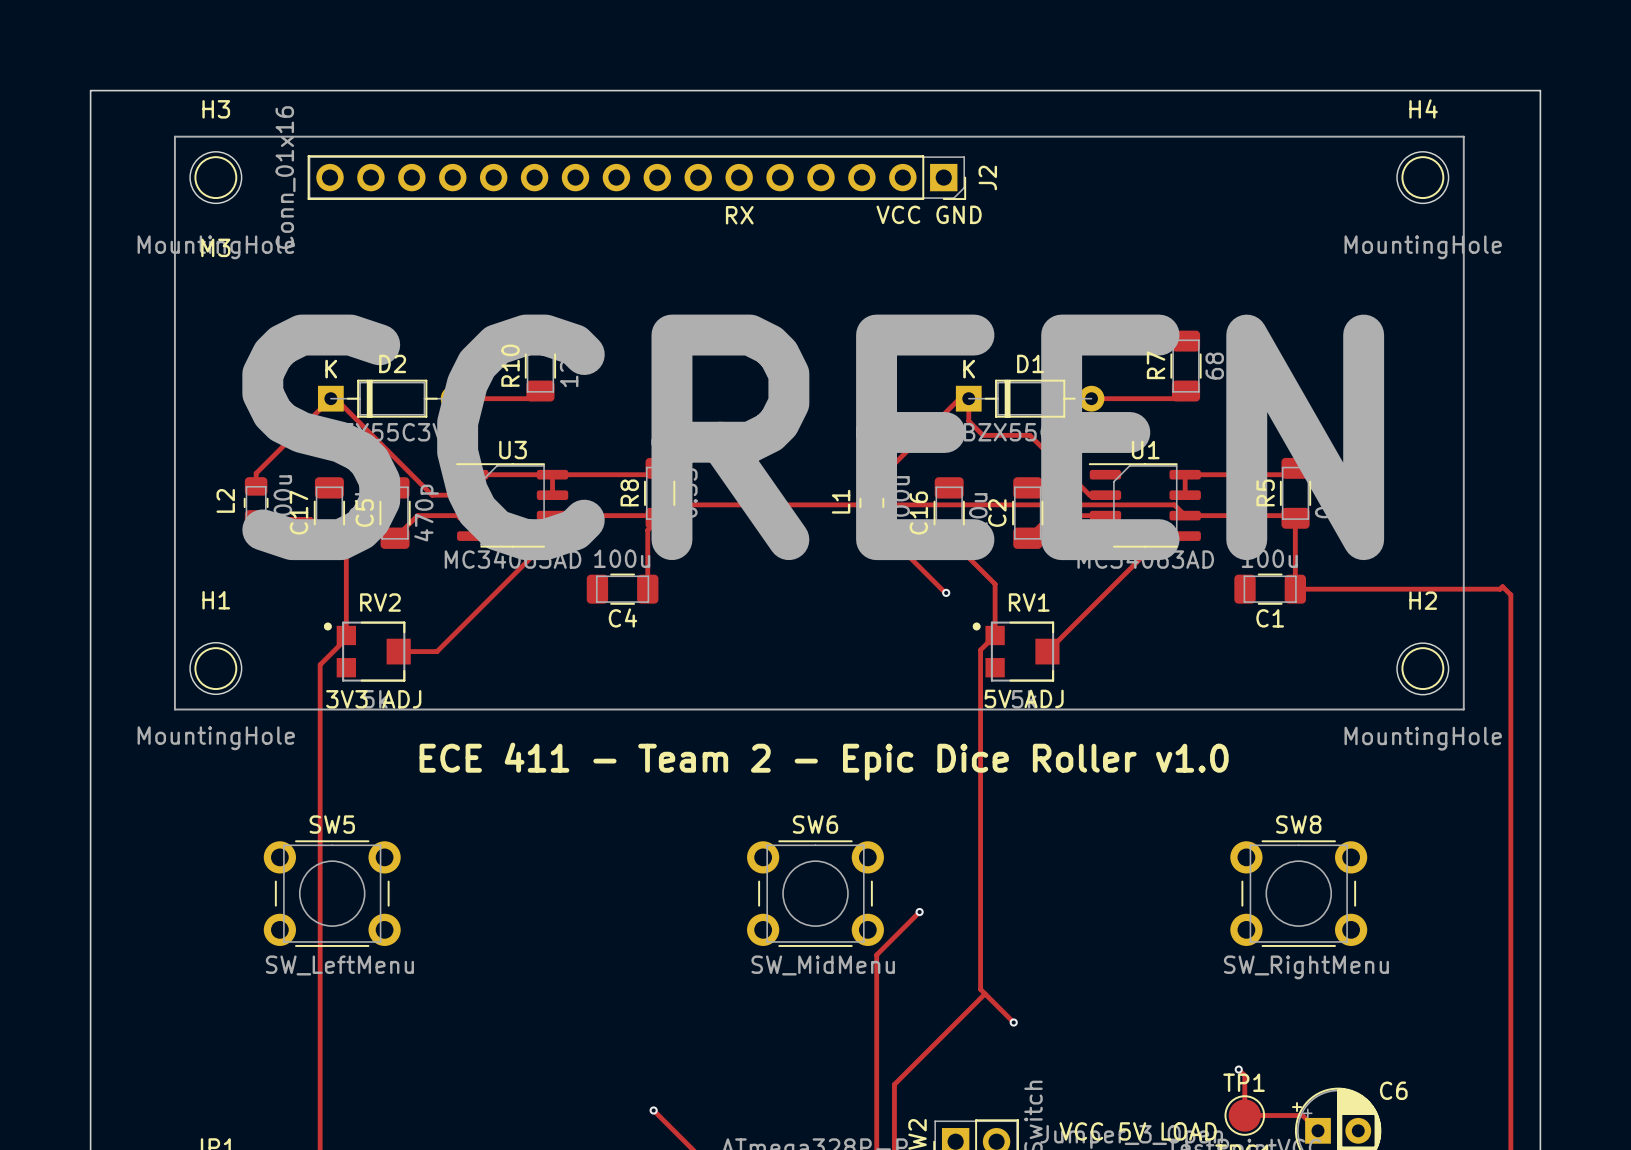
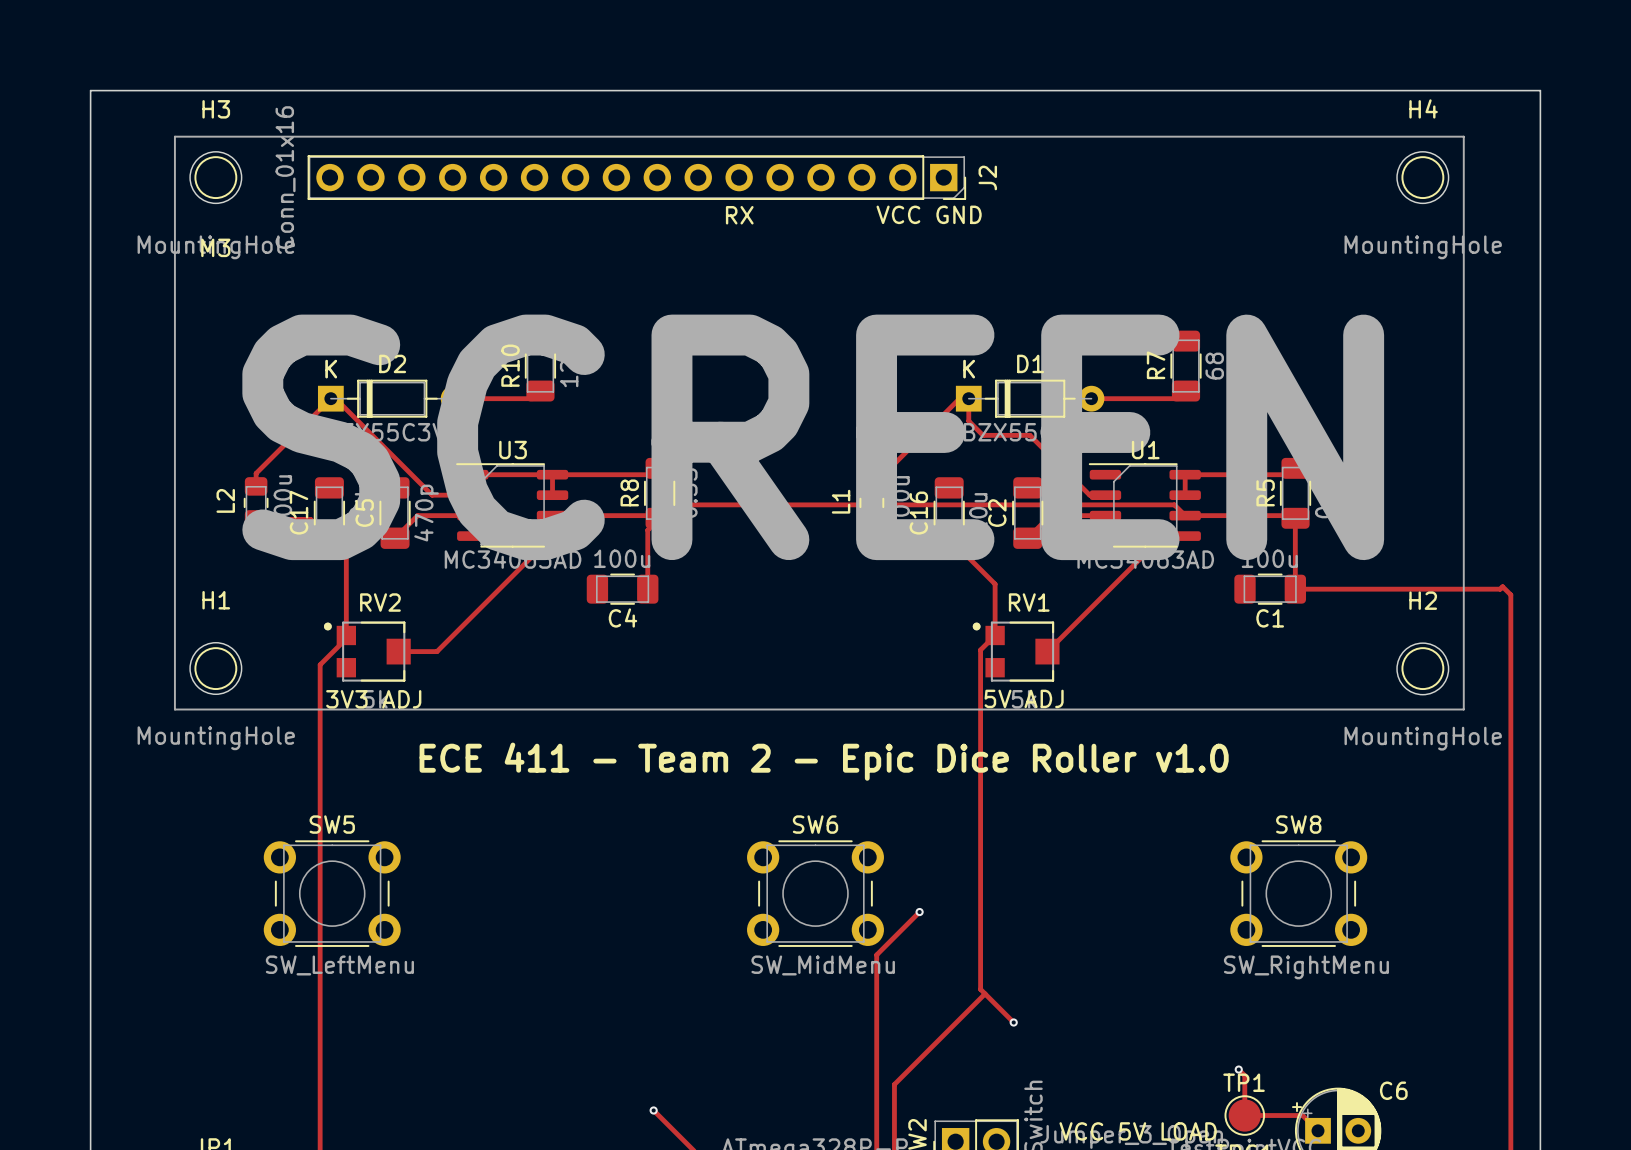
track: (890, 538) (946, 592) -> none
via: (946, 592) -> none

